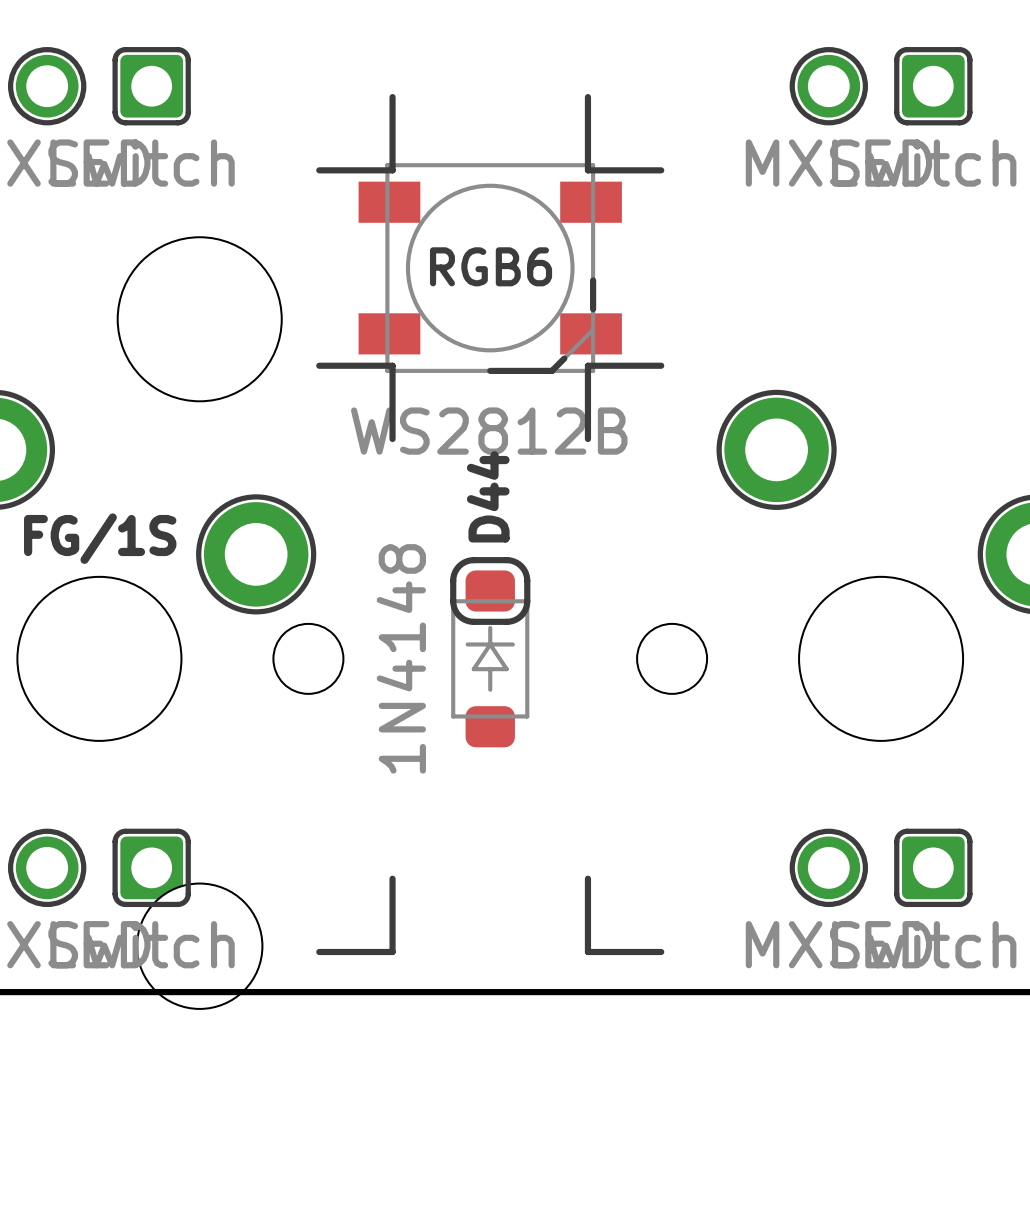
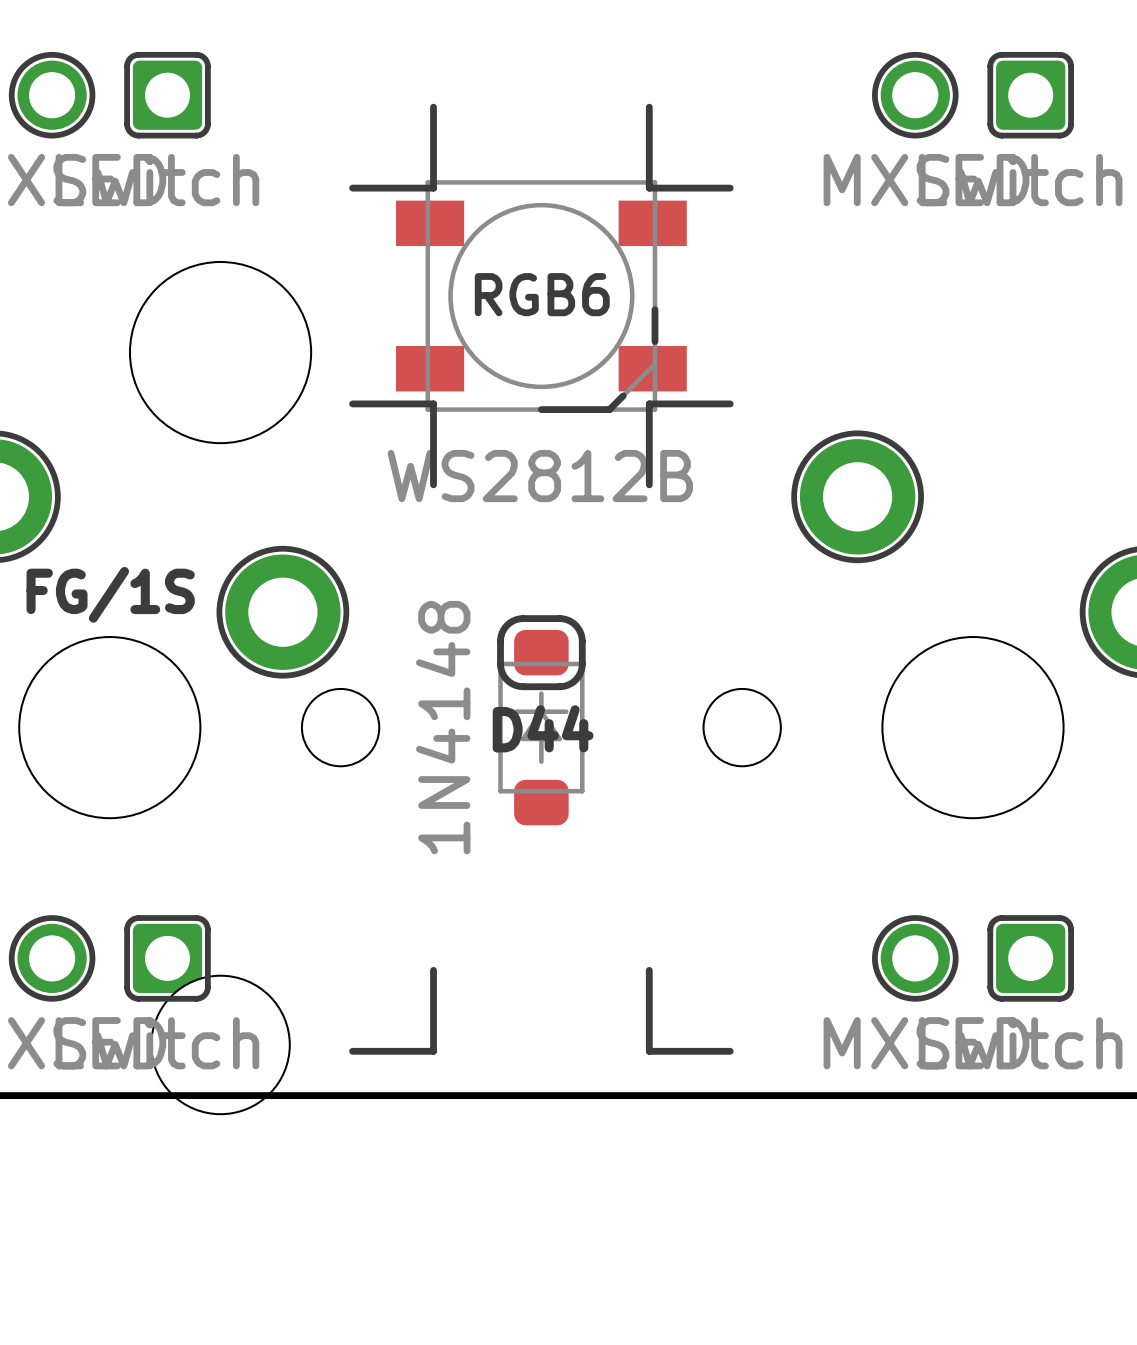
D44 name rotation: 0° (488, 496) -> 90° clockwise (543, 728)
D44 name position: D44 (488, 496) -> D44 (543, 728)

